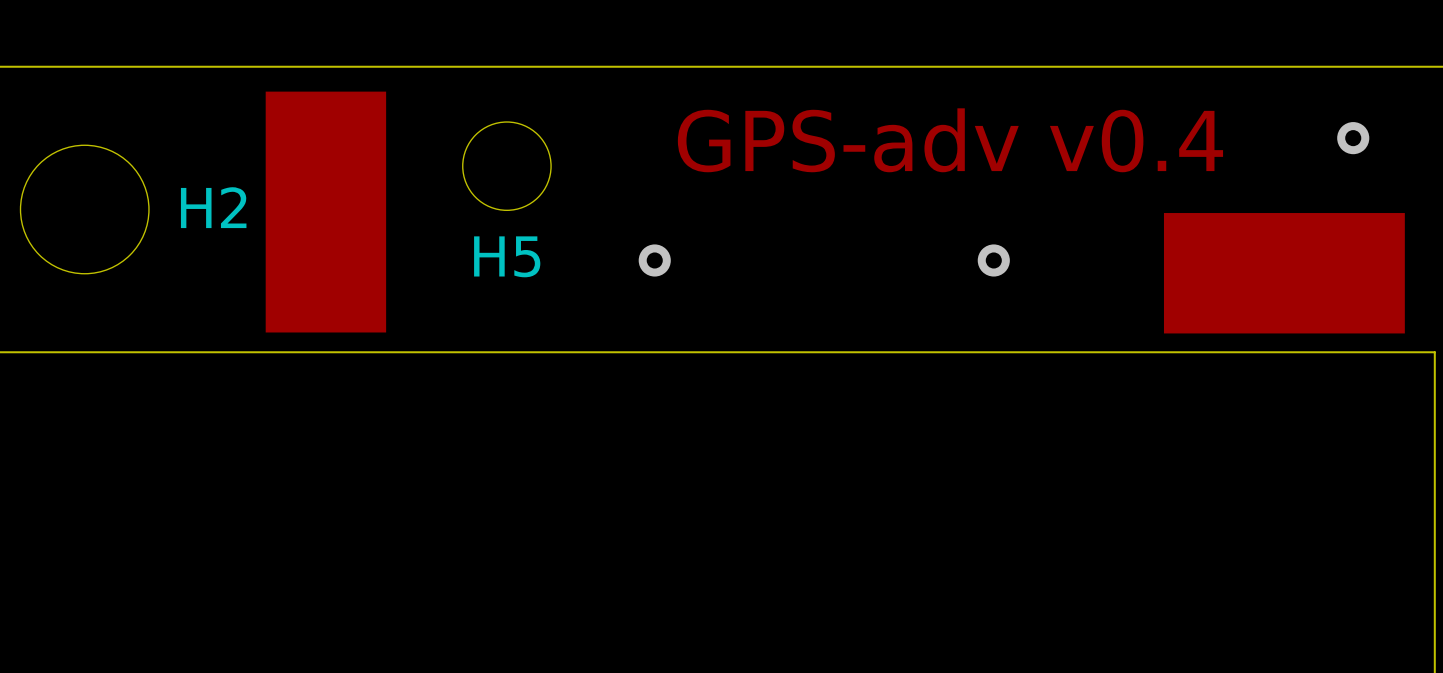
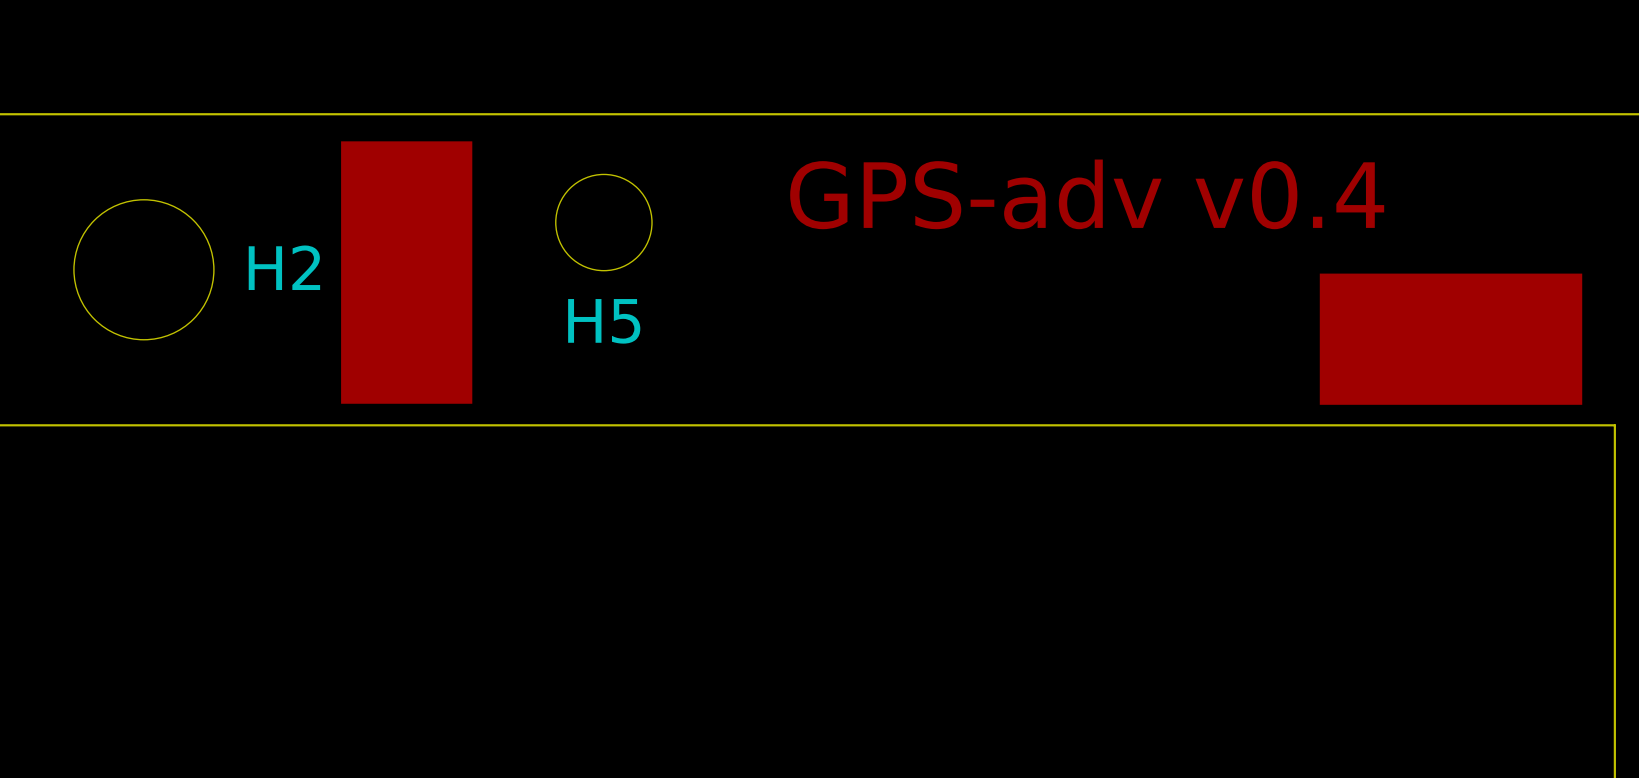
via: (1353, 138) -> none
via: (654, 260) -> none
via: (993, 260) -> none

